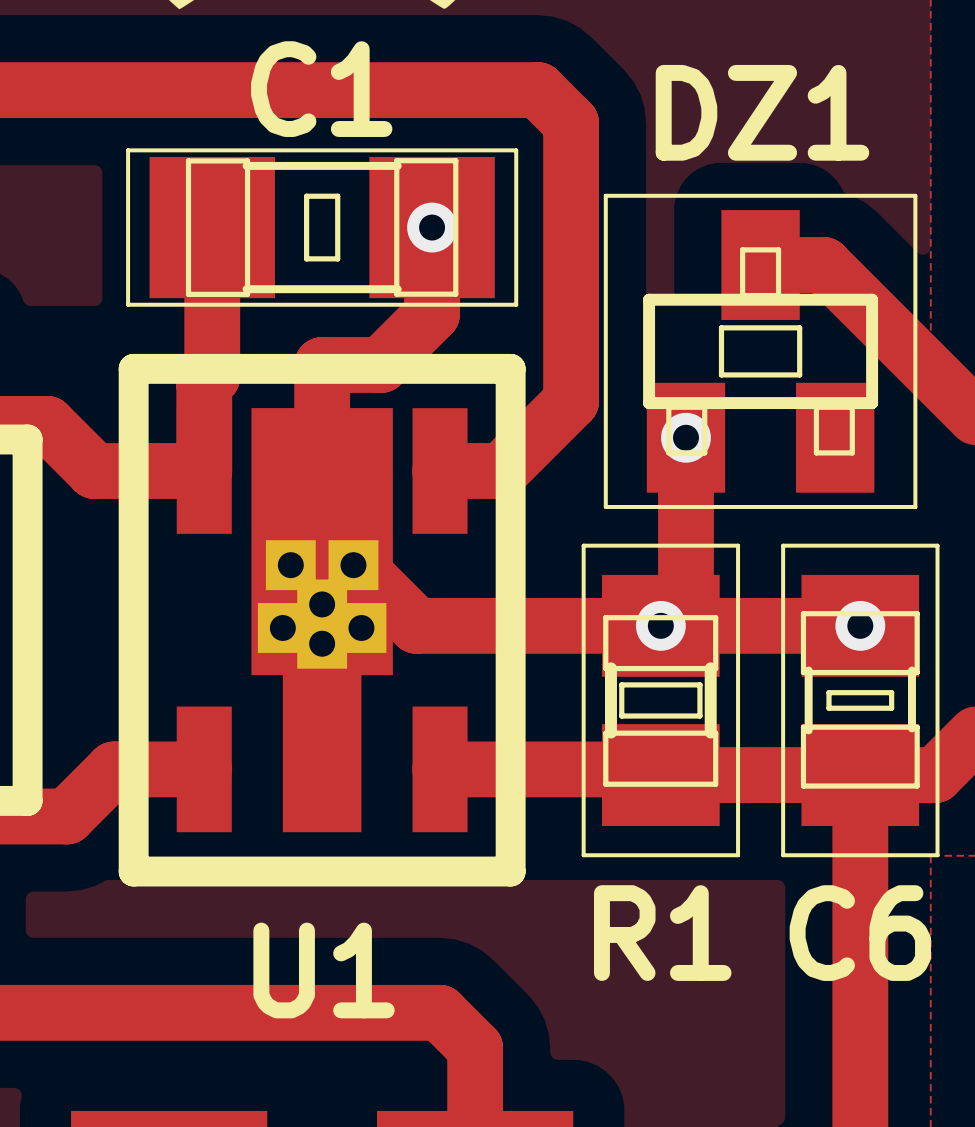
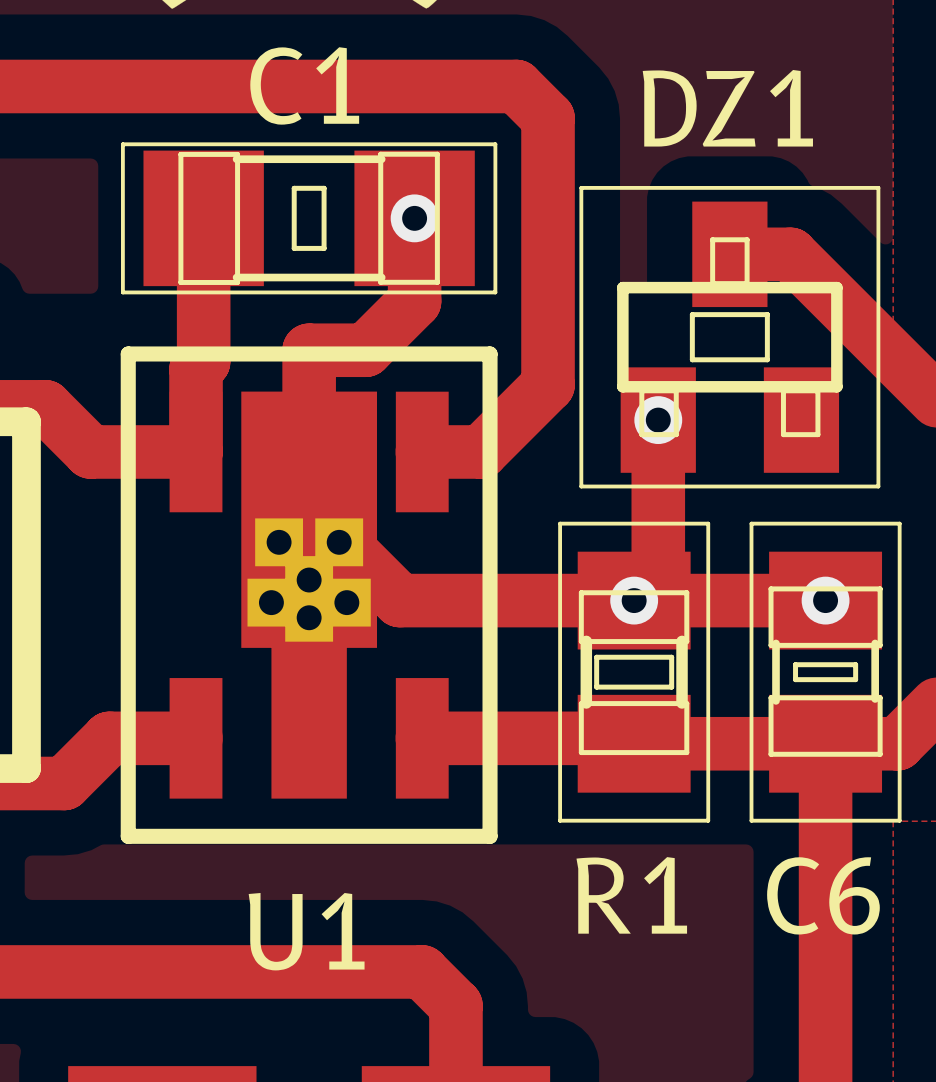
U1 footprint: [118, 353, 526, 887] -> [120, 346, 498, 844]

